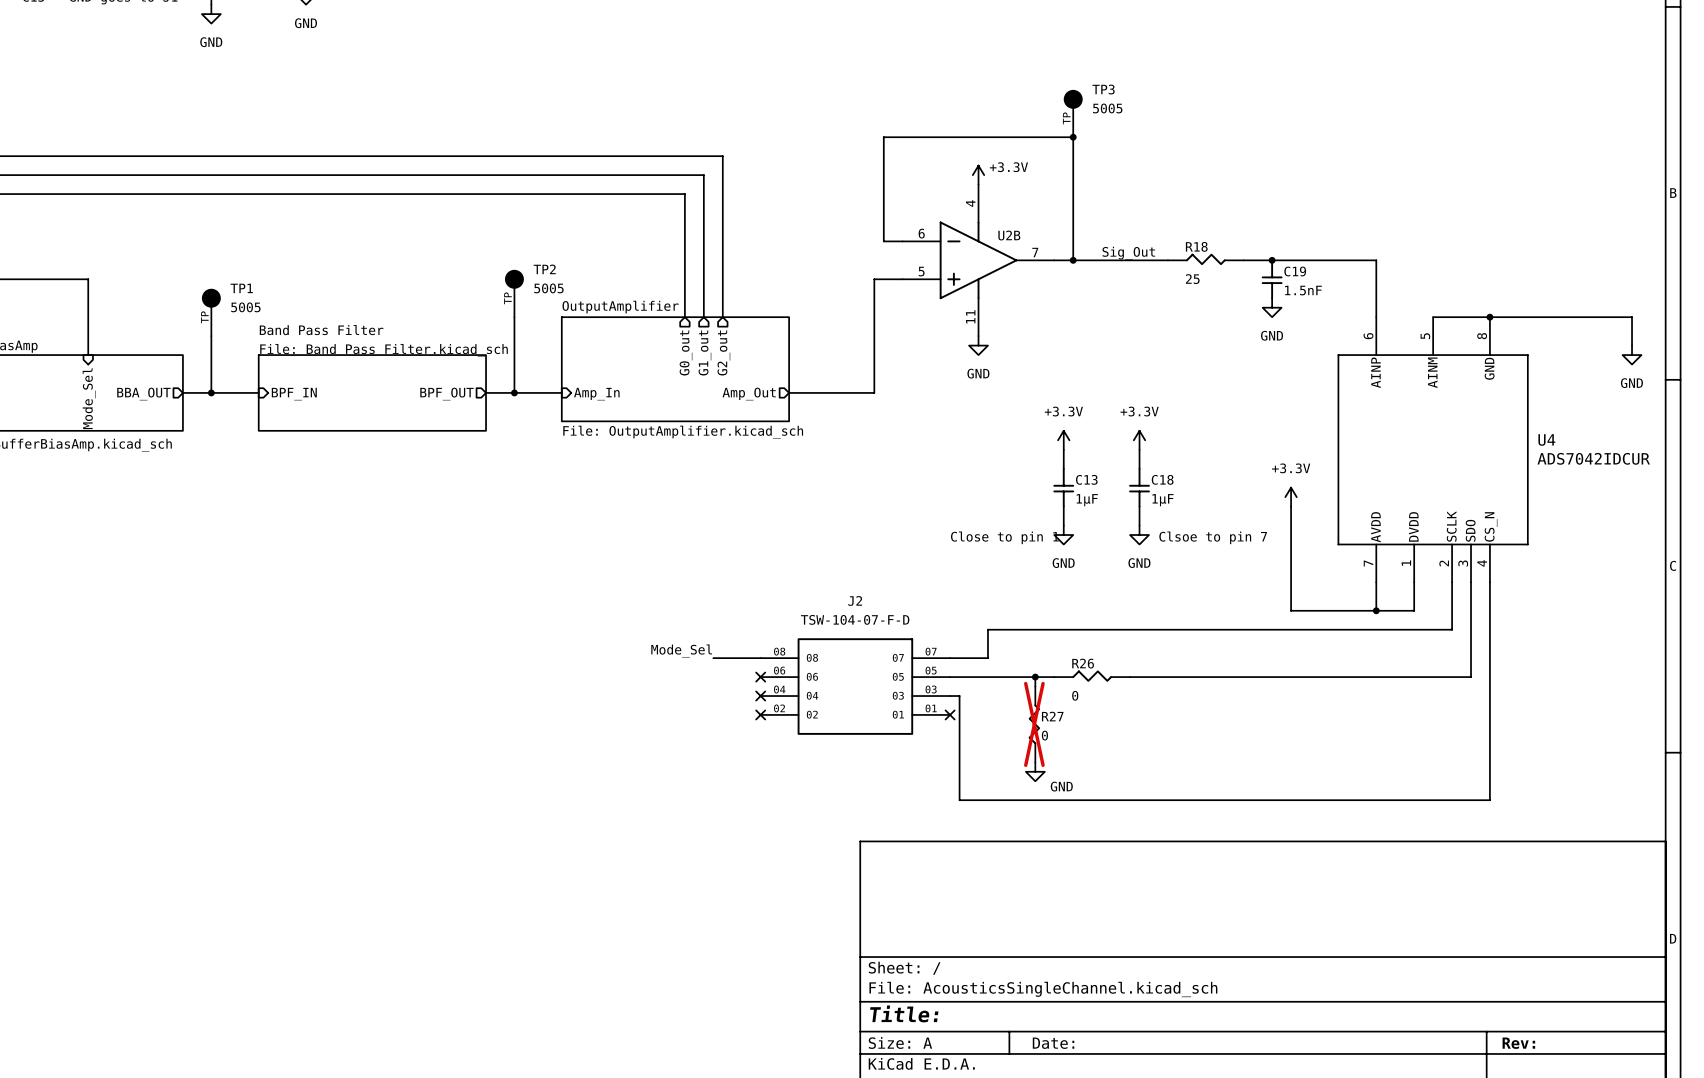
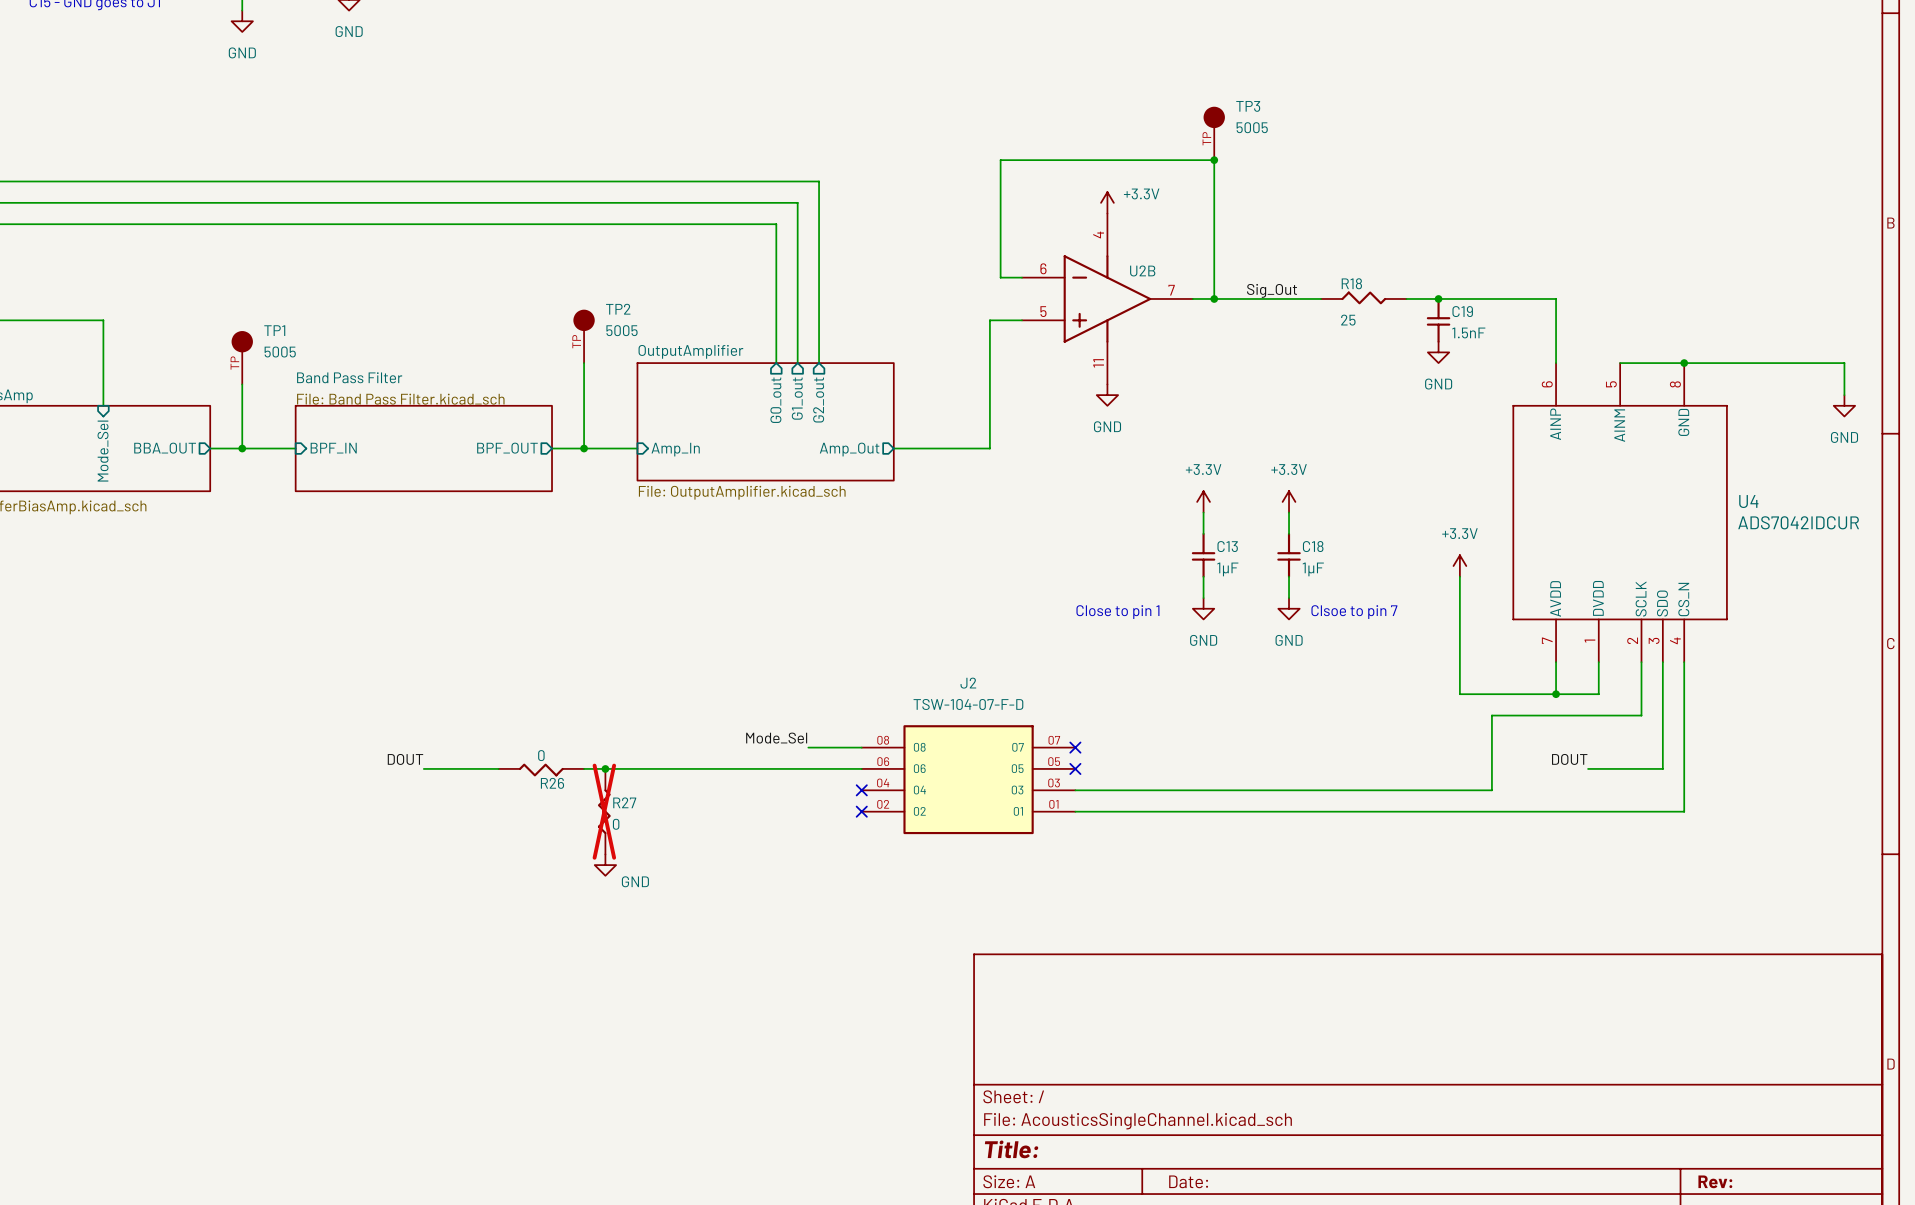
wire: (1319, 629) (987, 629) (987, 658) (950, 658) -> (1491, 715) (1491, 790) (1086, 790)
no-connect mark: none -> (1075, 747)
label: none -> DOUT (405, 759)
label: none -> DOUT (1569, 759)
R26 rotation: 0° (1092, 676) -> 180° (541, 770)
R26 position: (1092, 676) -> (541, 770)
wire: none -> (423, 768) (498, 768)
wire: none -> (584, 768) (861, 768)
junction: none -> (605, 768)
no-connect mark: (760, 677) -> none
wire: (950, 677) (1054, 677) -> none
no-connect mark: none -> (1075, 768)
wire: (1035, 677) (1035, 686) -> none
junction: (1035, 677) -> none
wire: (1130, 677) (1404, 677) -> none
wire: (959, 696) (959, 800) (1489, 800) (1489, 714) -> (1075, 811) (1684, 811)
no-connect mark: (950, 714) -> none
R27 position: (1034, 724) -> (604, 811)
power symbol: none -> GND (605, 865)
power symbol: GND (1035, 771) -> none

